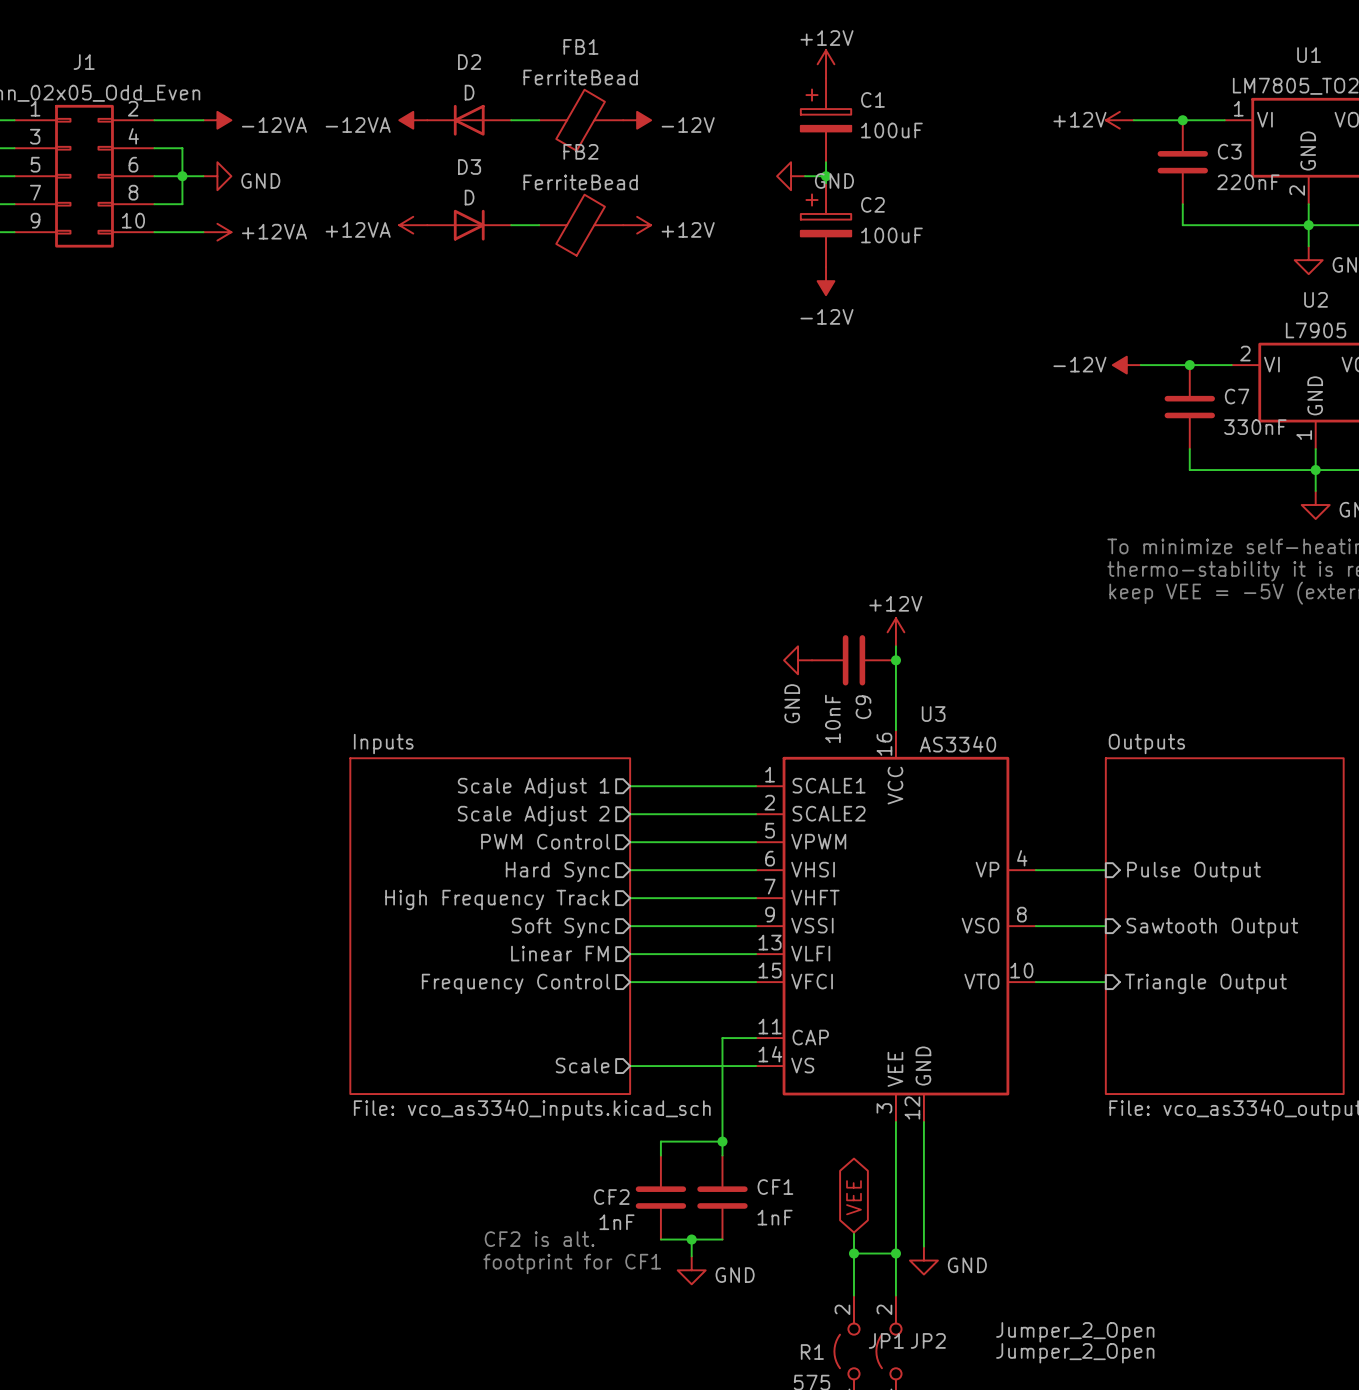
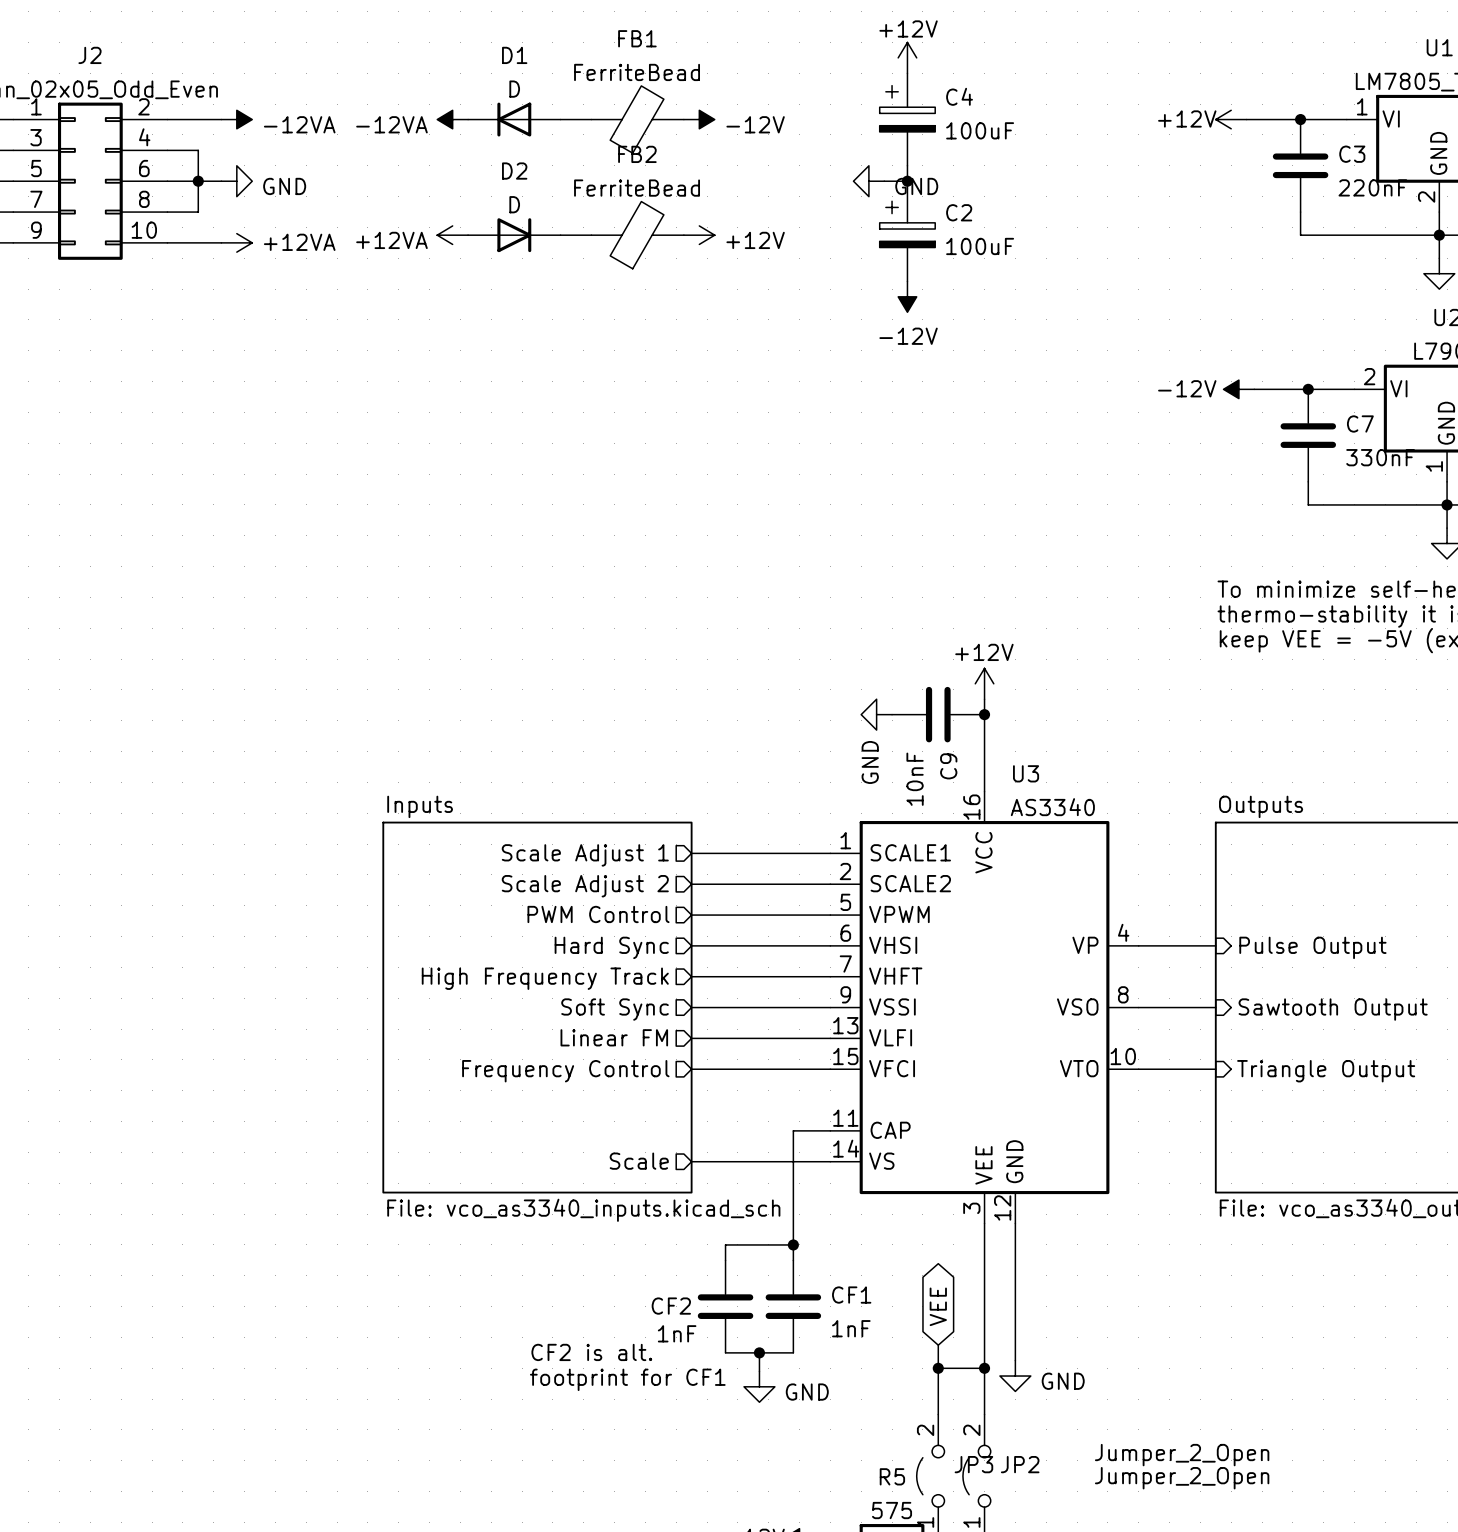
J1 name: J1 (84, 62) -> J2 (90, 55)
D2 name: D2 (469, 62) -> D1 (514, 55)
C1 name: C1 (872, 99) -> C4 (959, 96)
D3 name: D3 (469, 166) -> D2 (514, 171)
JP1 name: JP1 (886, 1340) -> JP3 (973, 1464)
R1 name: R1 (812, 1352) -> R5 (892, 1476)

